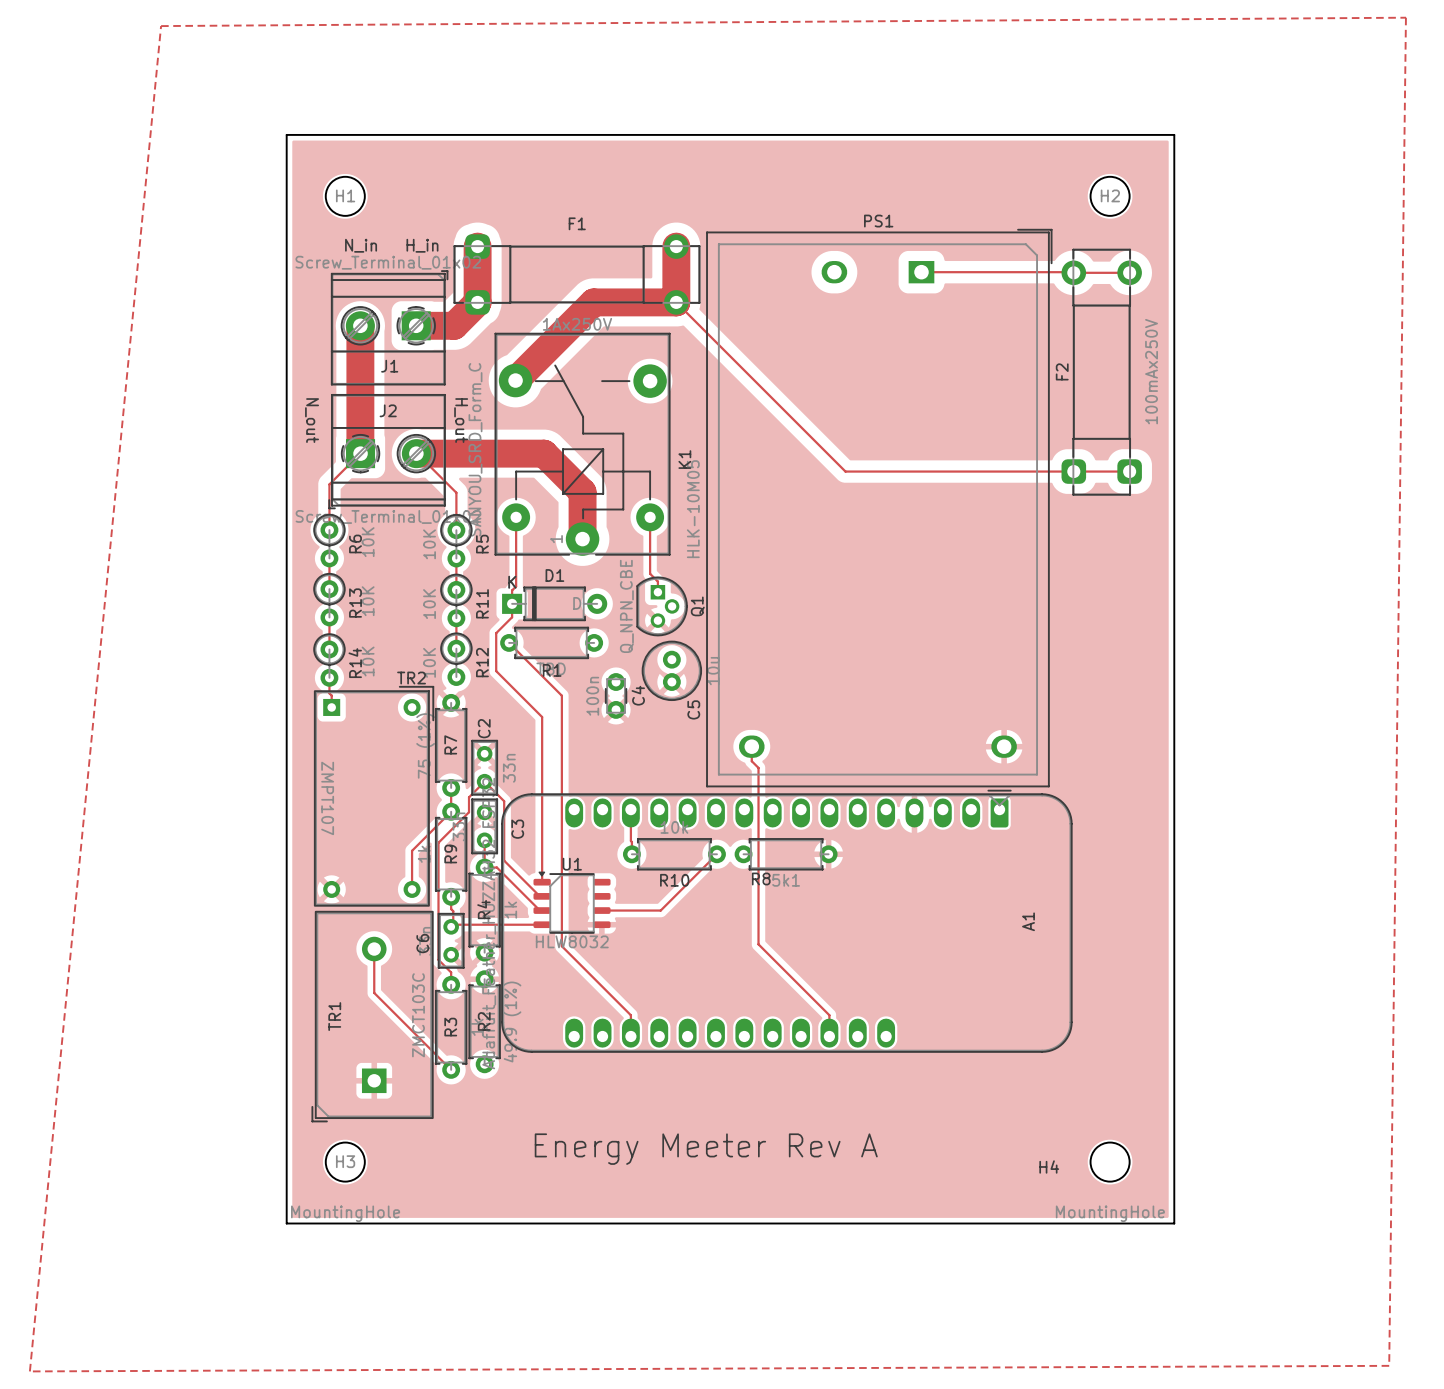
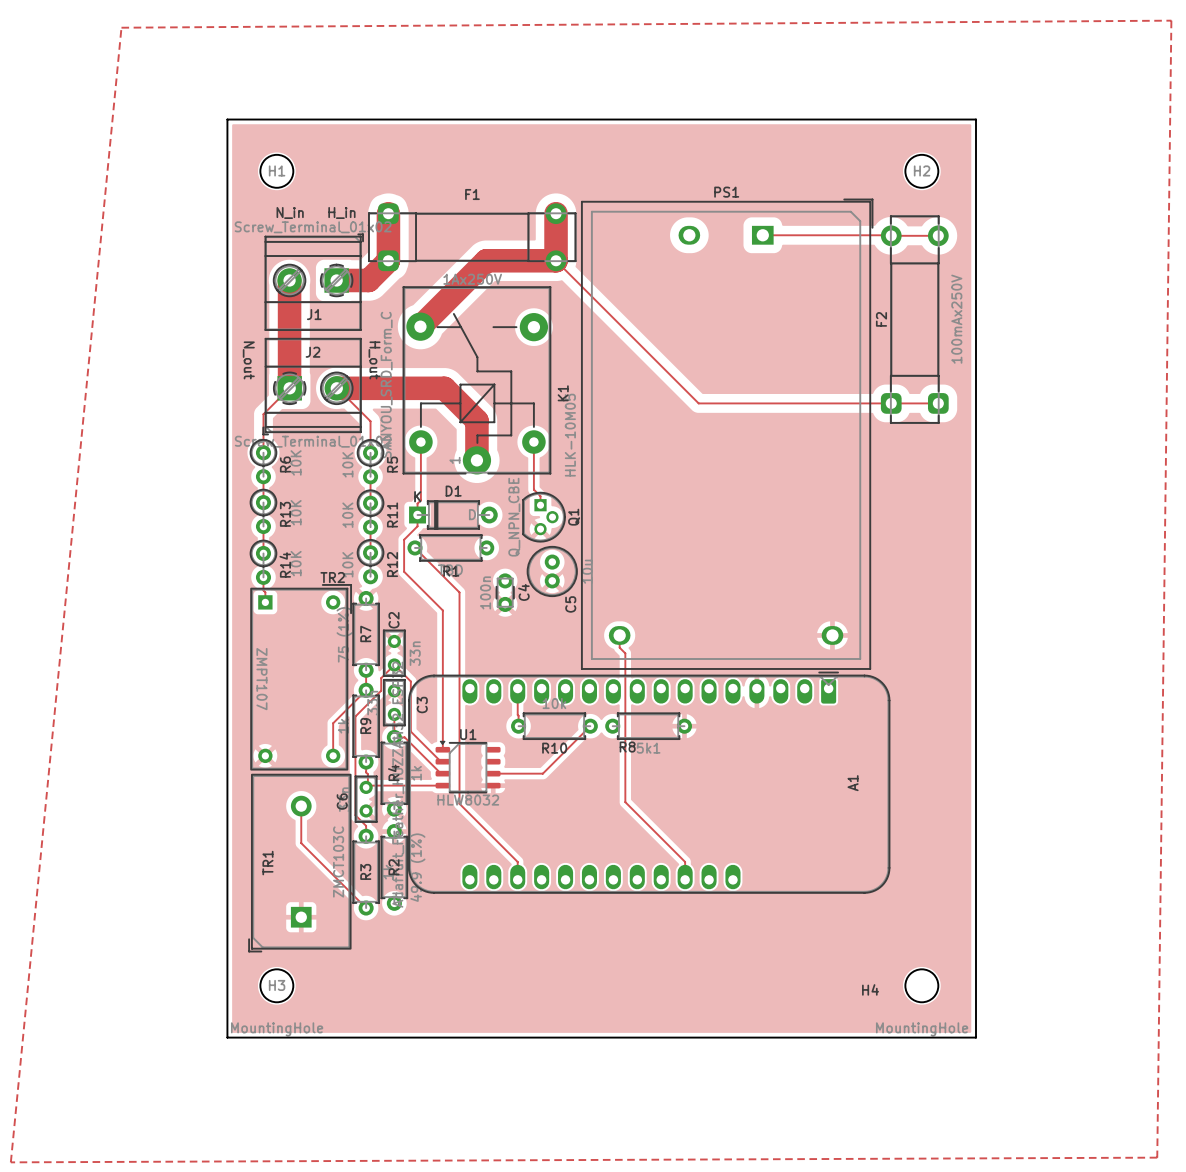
text: Energy Meeter Rev A (706, 1149) -> none

